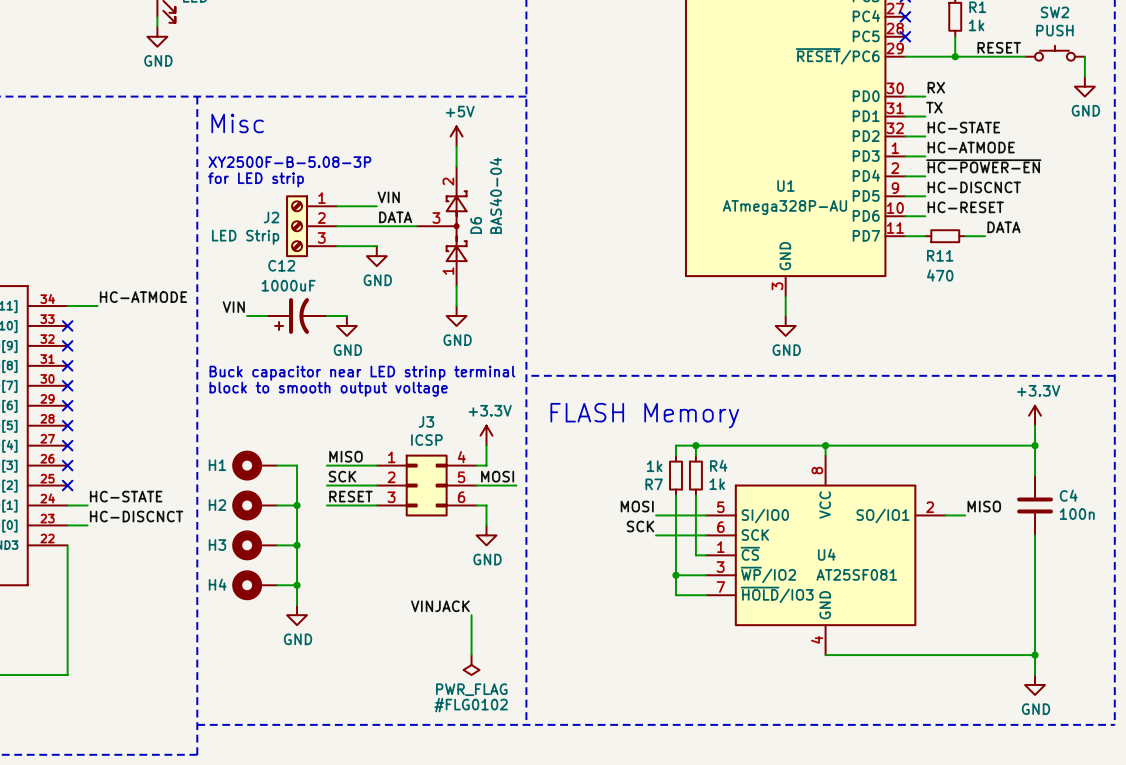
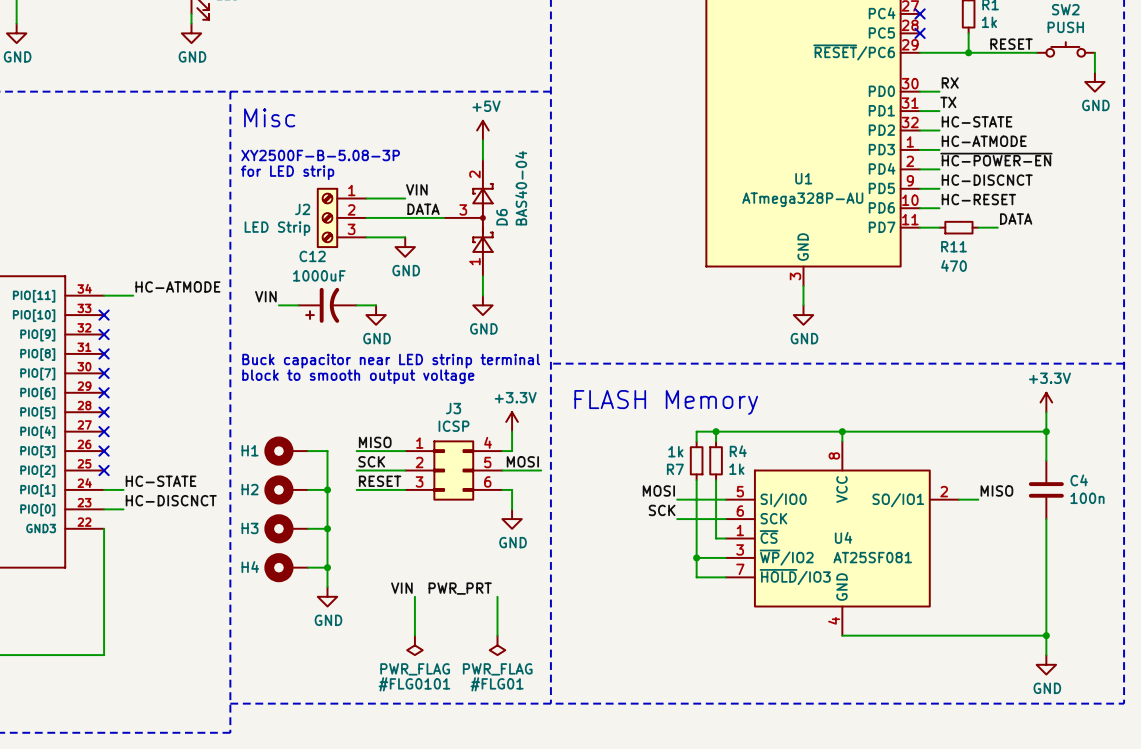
label: none -> VIN (401, 588)
label: VINJACK (440, 606) -> PWR_PRT (460, 588)
wire: none -> (414, 596) (414, 635)
#FLG0101: none -> PWR_FLAG (414, 645)
#FLG0102 name: #FLG0102 (471, 705) -> #FLG01 (497, 684)

